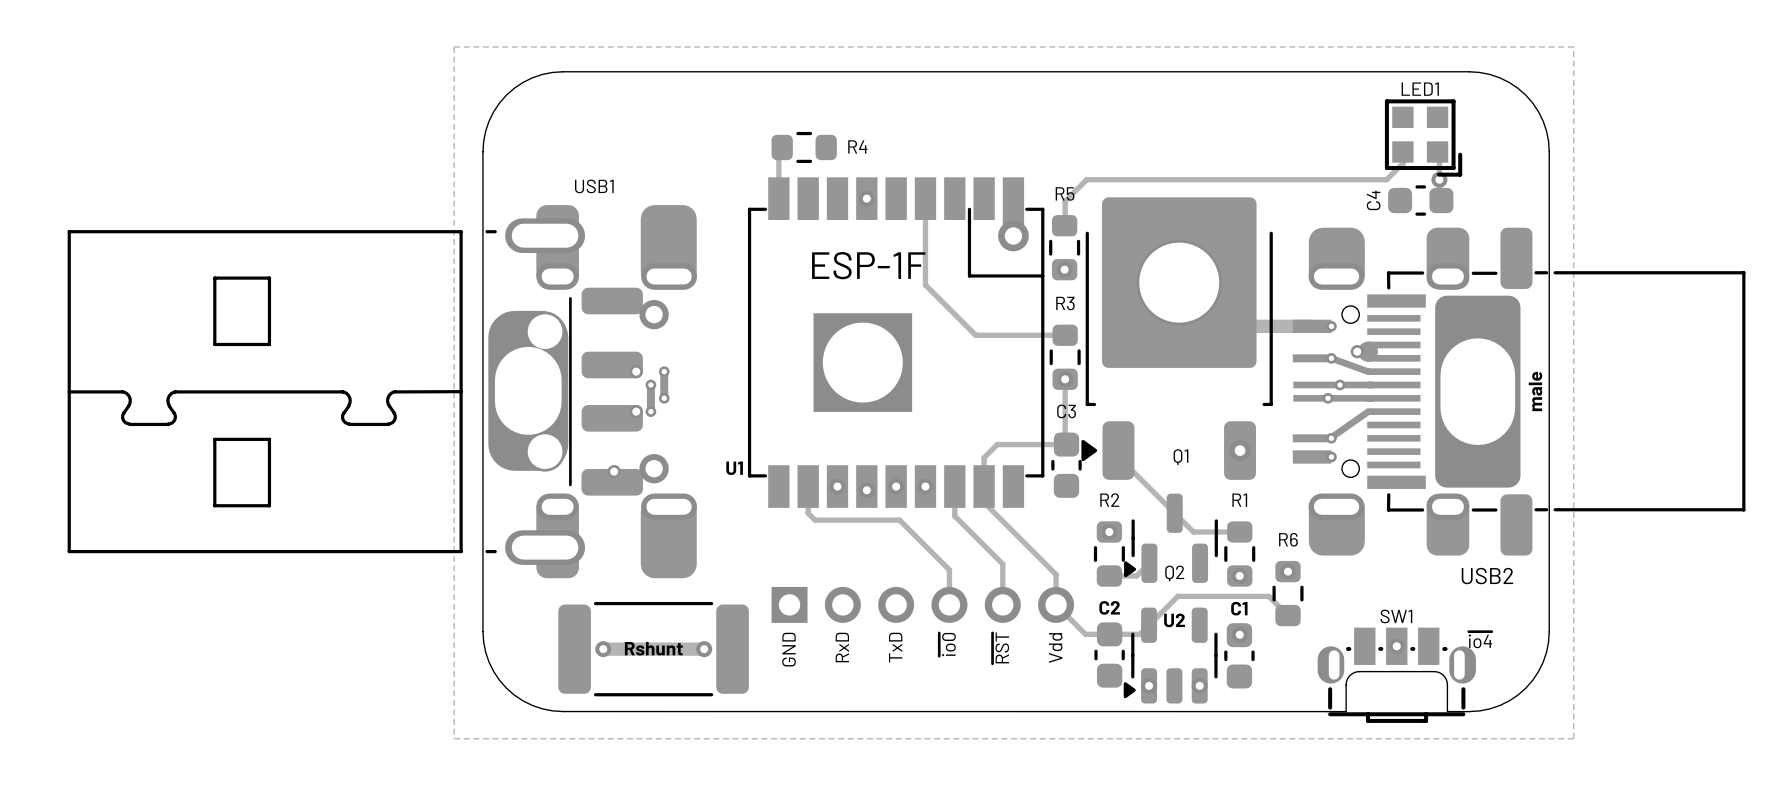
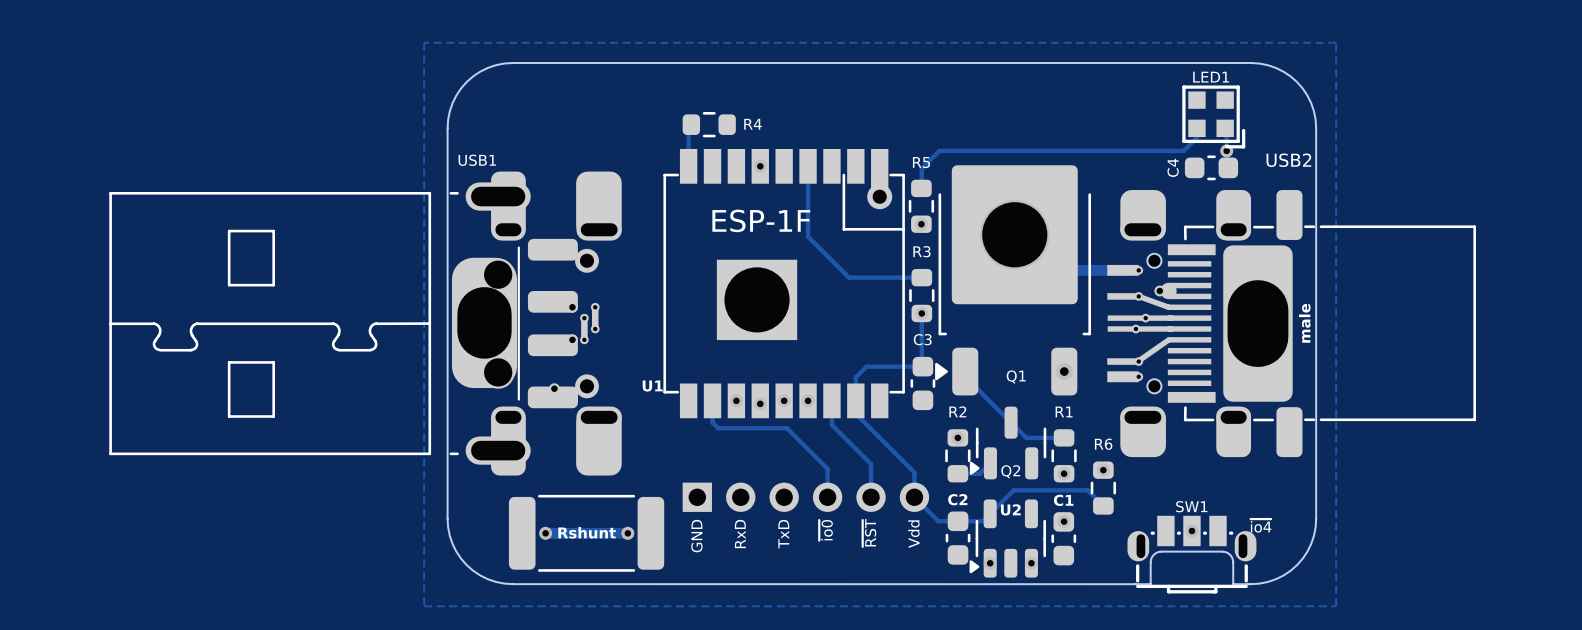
USB1 name position: USB1 (594, 186) -> USB1 (477, 160)
USB2 name position: USB2 (1487, 576) -> USB2 (1288, 160)

